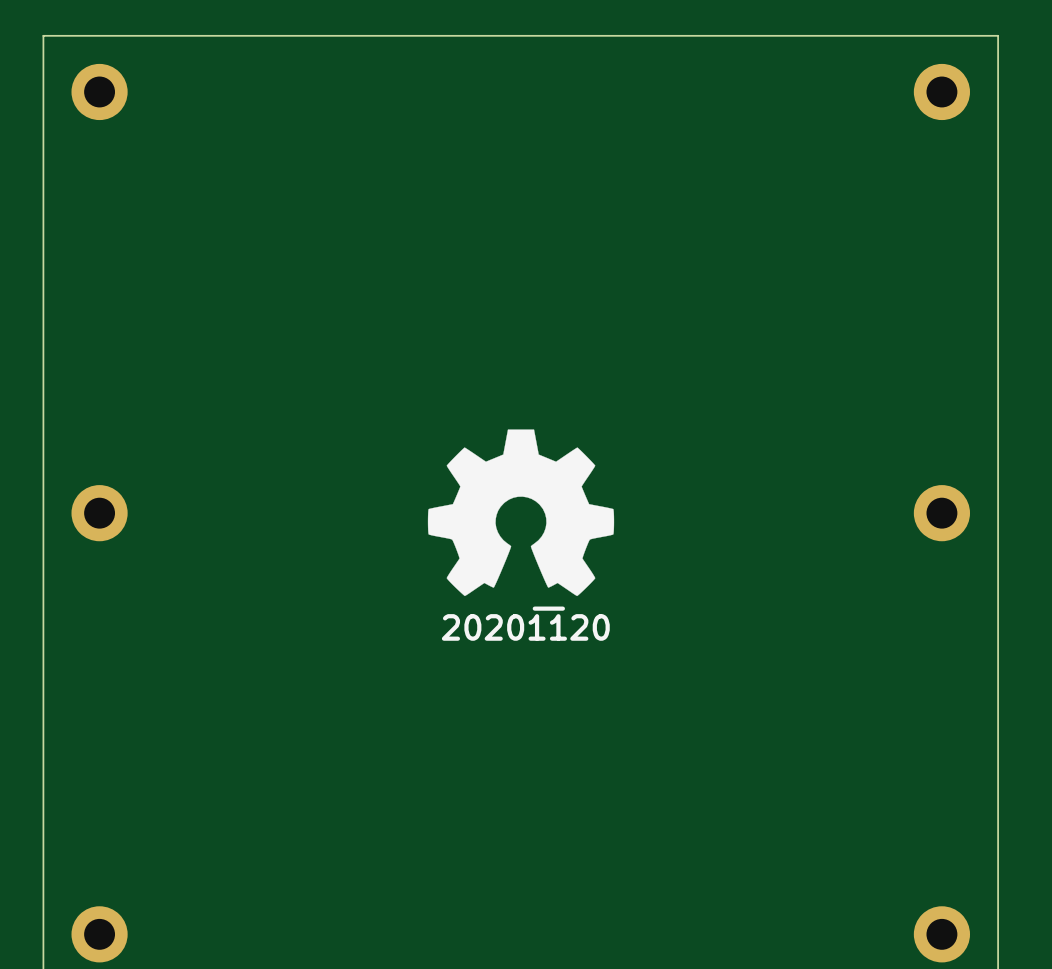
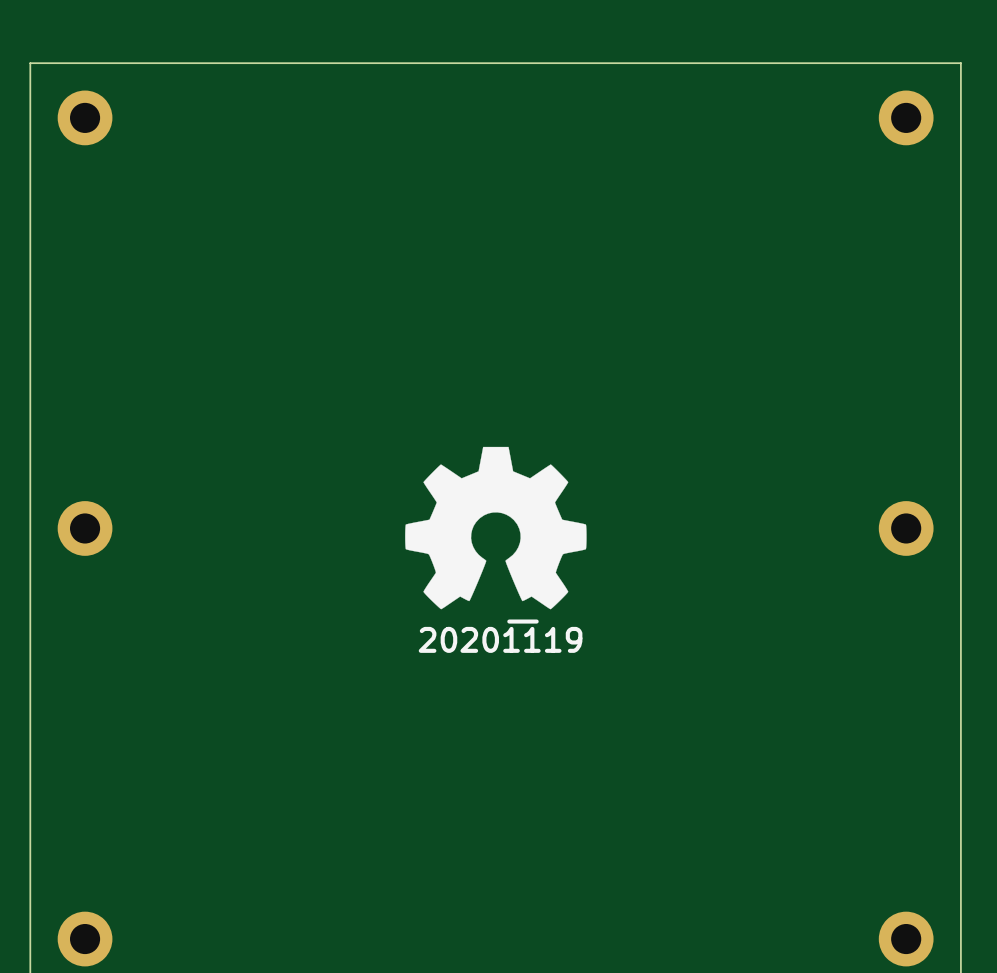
drawing shape: [441, 606, 610, 641] -> [418, 619, 583, 653]

